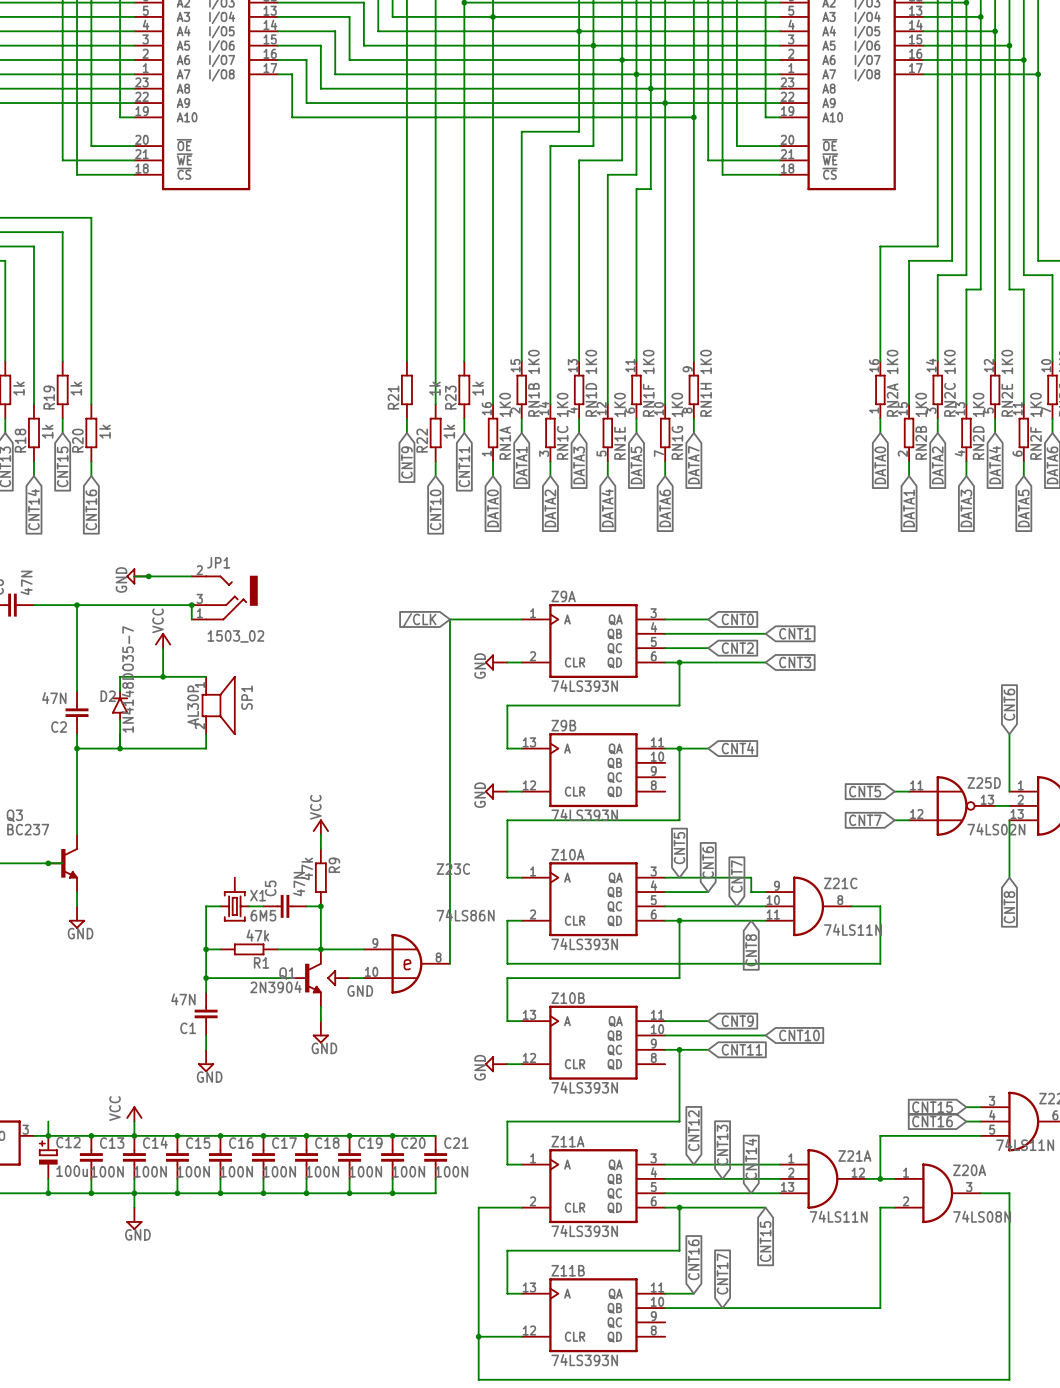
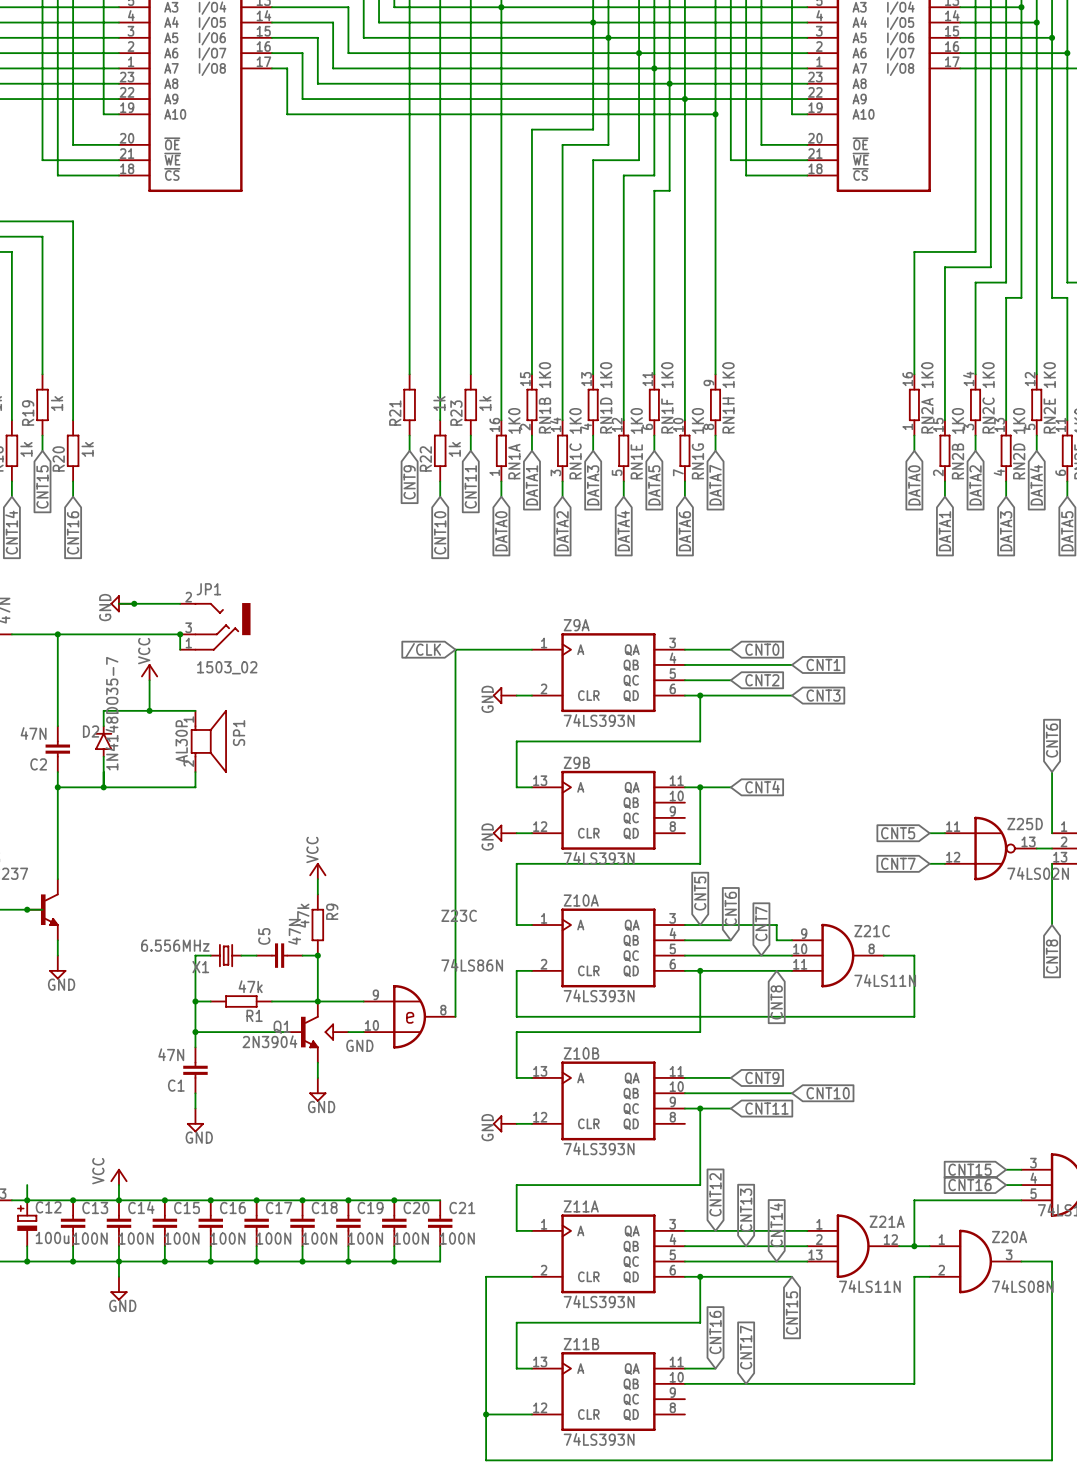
X1 symbol: [220, 877, 250, 922] -> [210, 944, 242, 968]
X1 name position: X1 (258, 895) -> X1 (200, 967)
X1 value: 6M5 (263, 915) -> 6.556MHz (175, 945)

